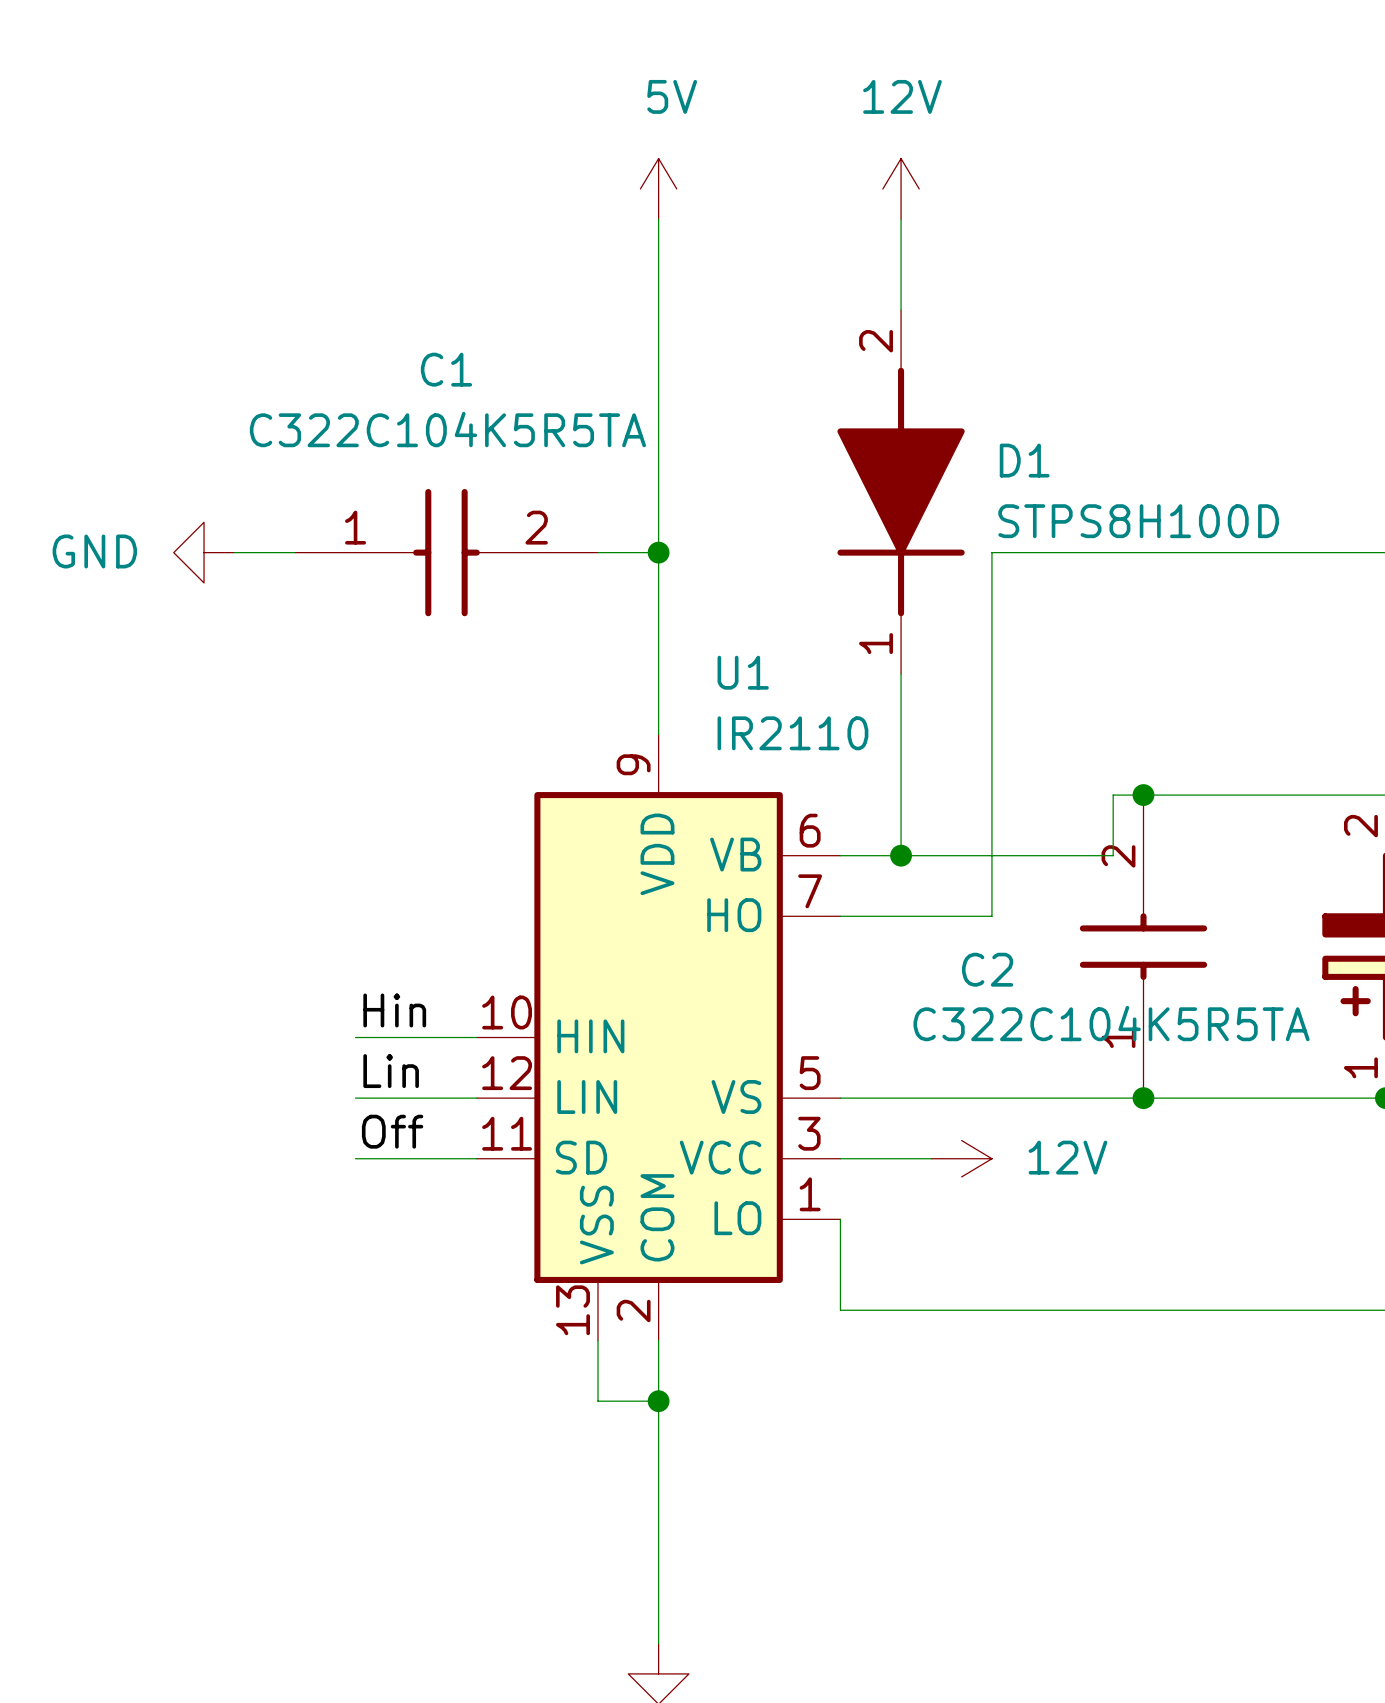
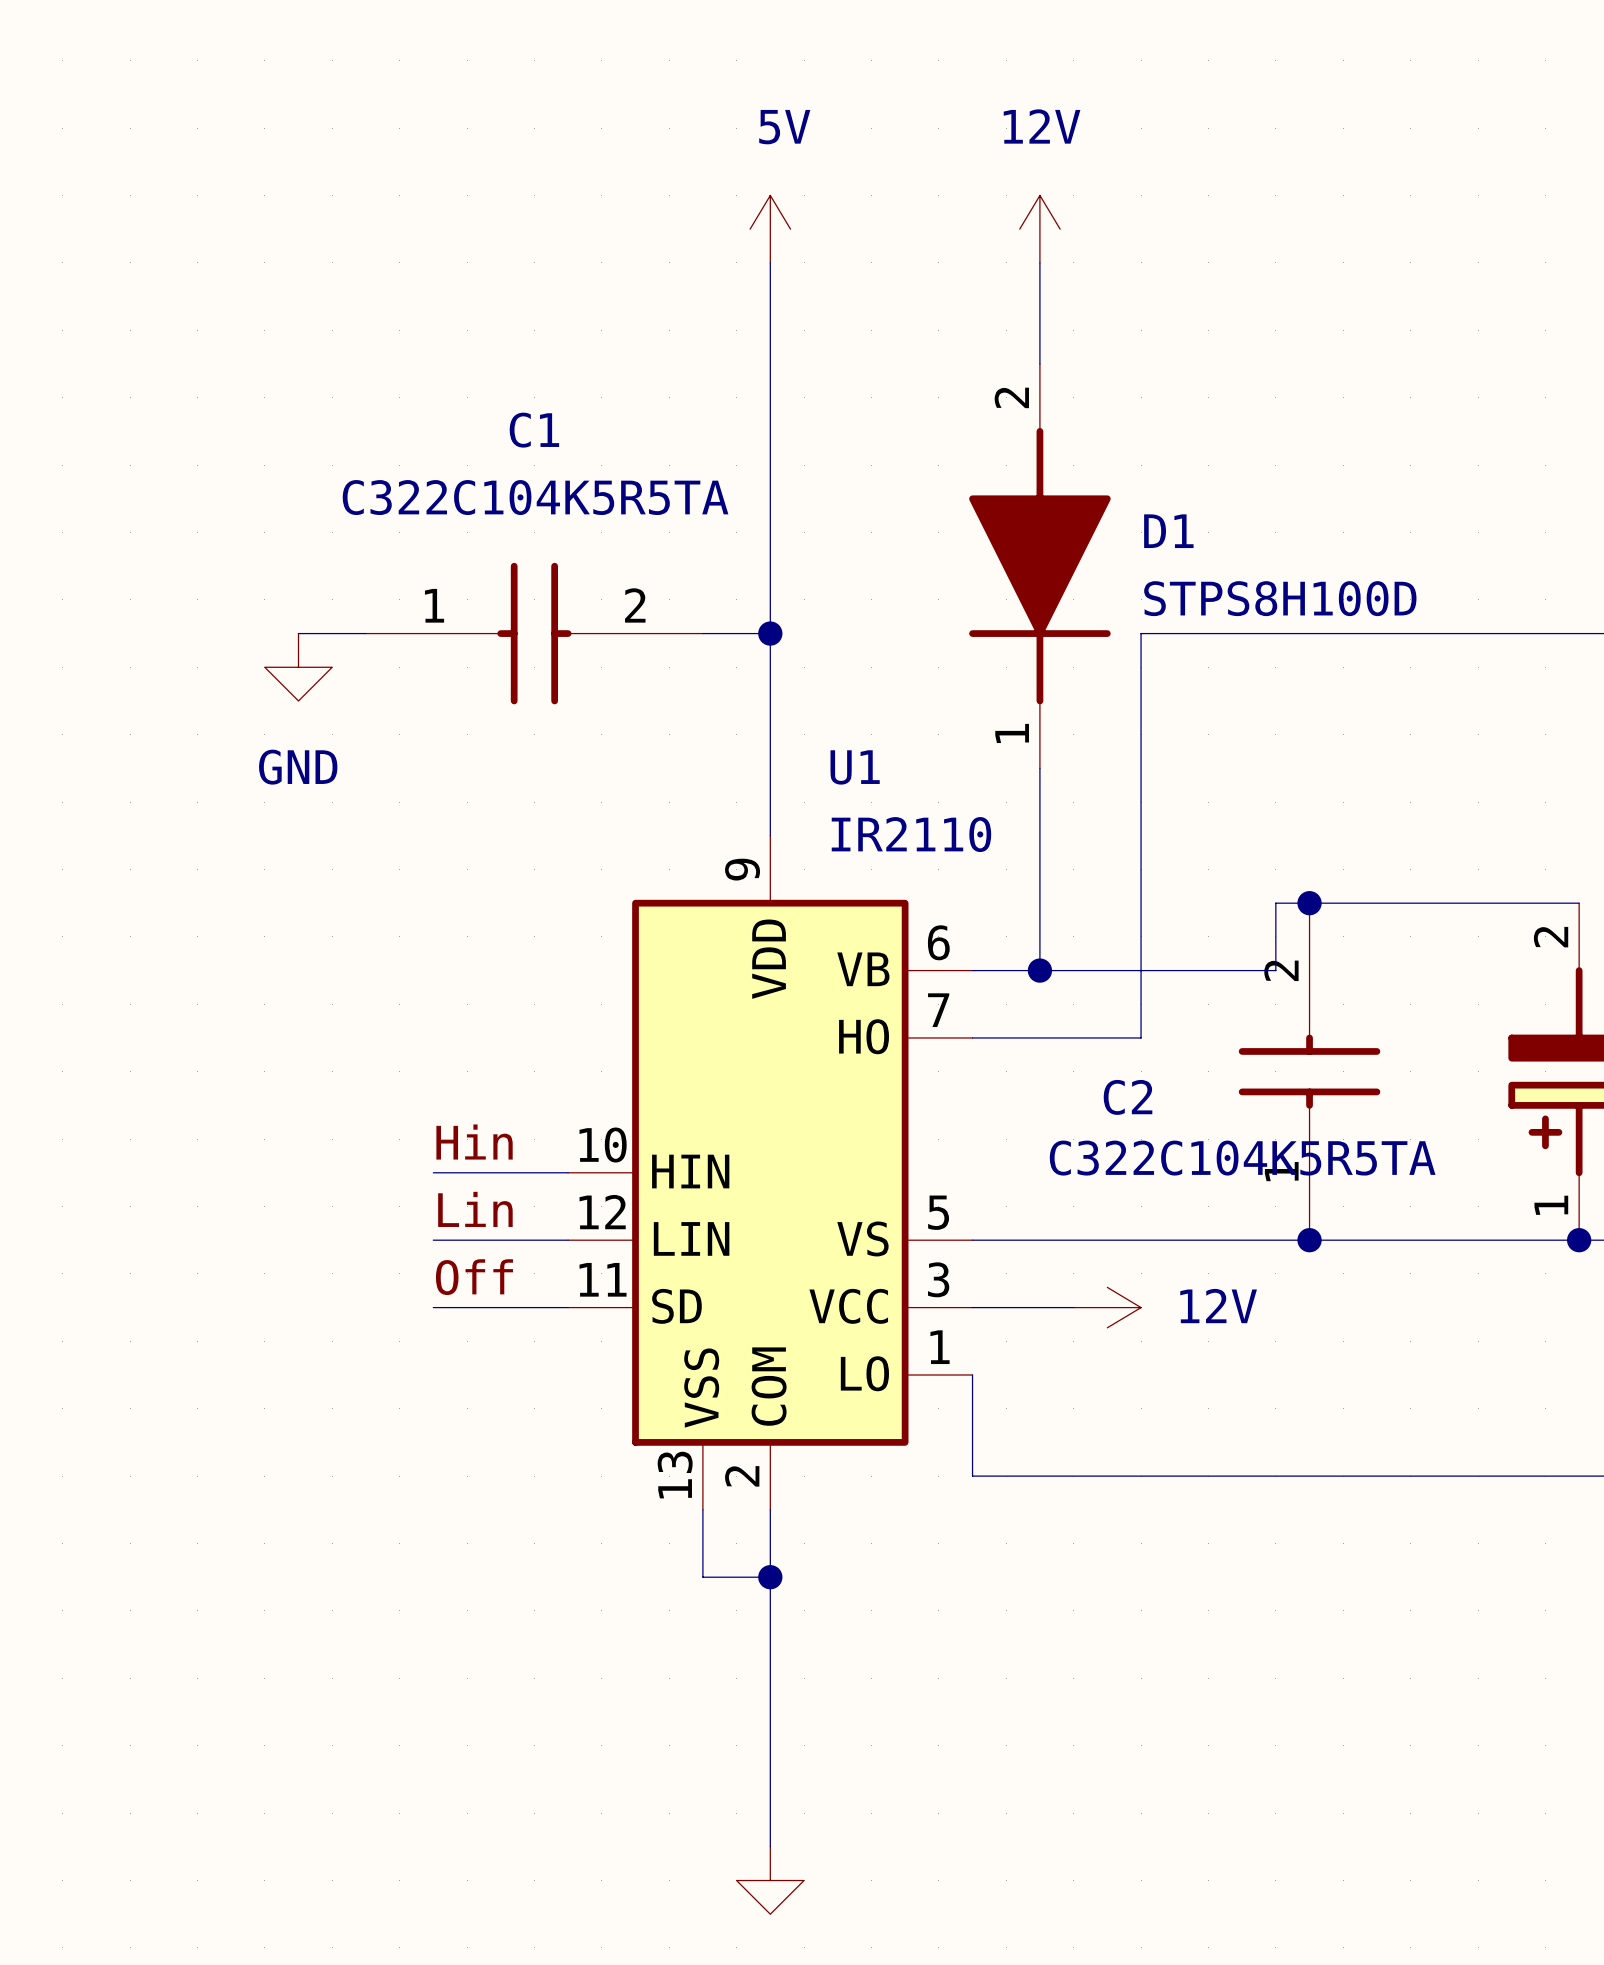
power symbol rotation: 0° (204, 552) -> 90° counterclockwise (298, 667)
power symbol position: GND (204, 552) -> GND (298, 667)

